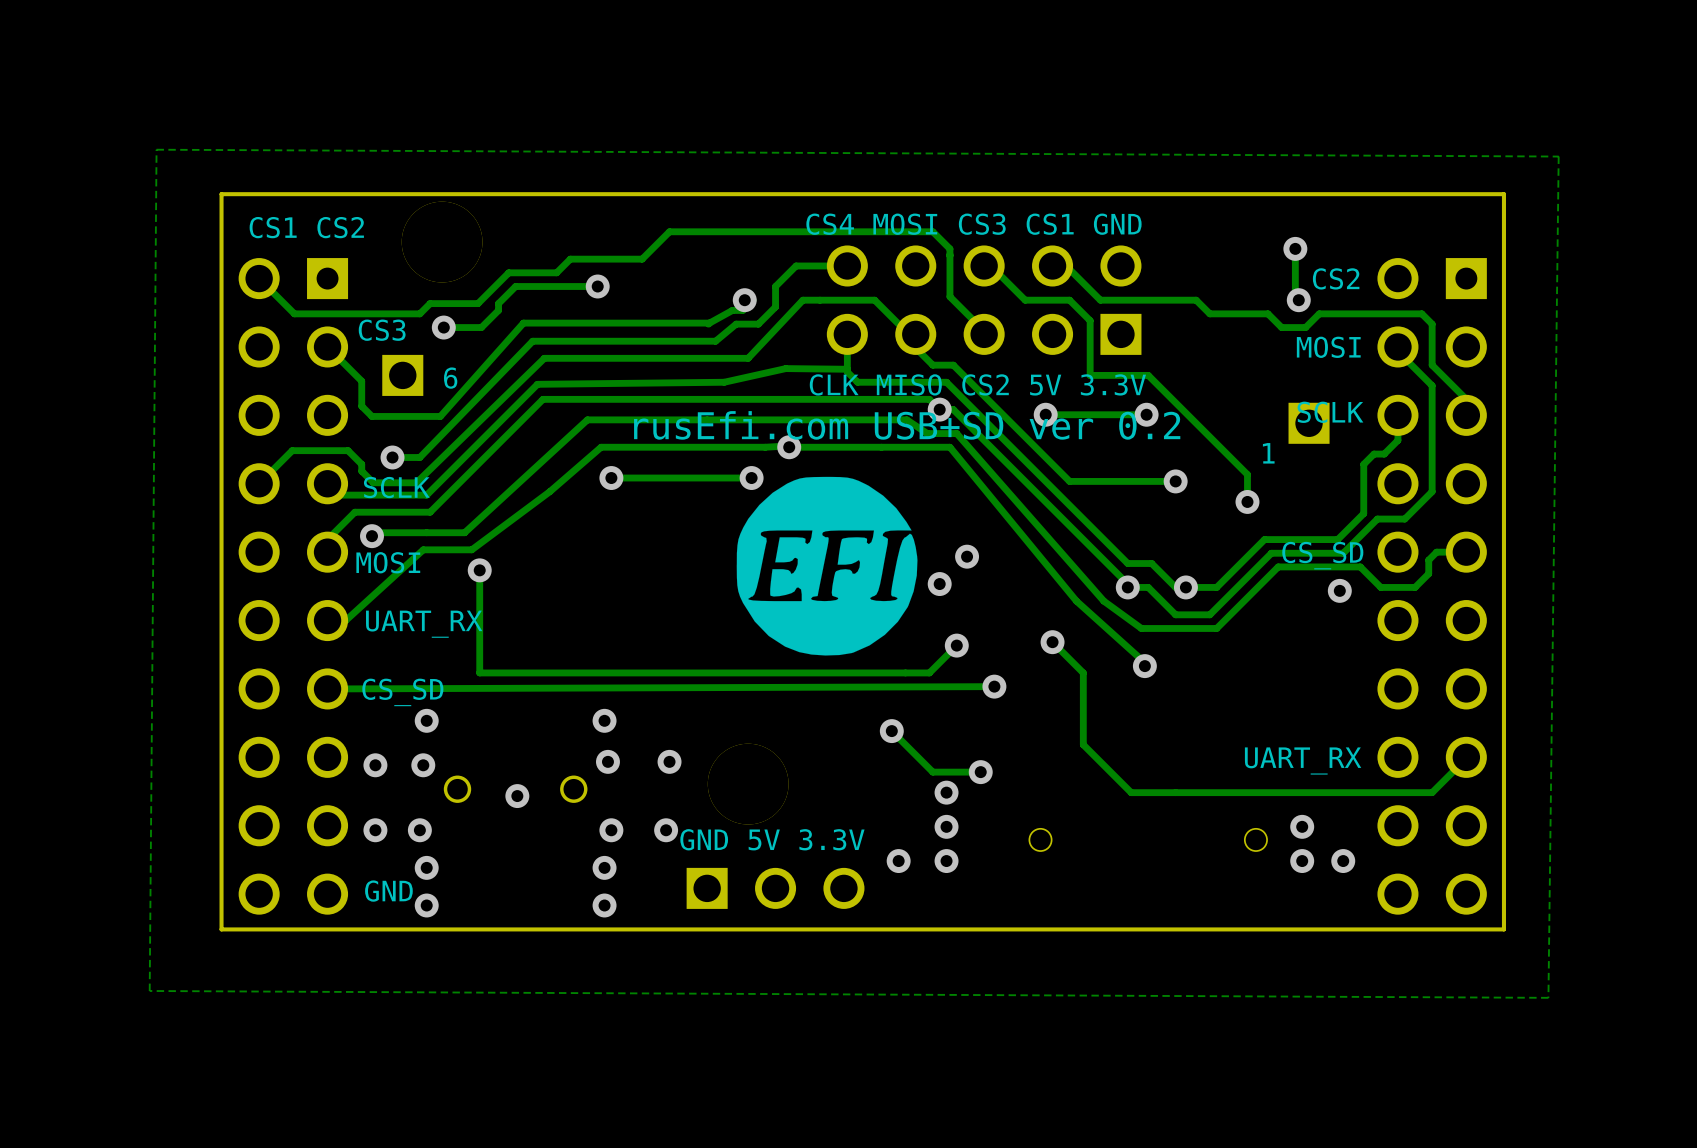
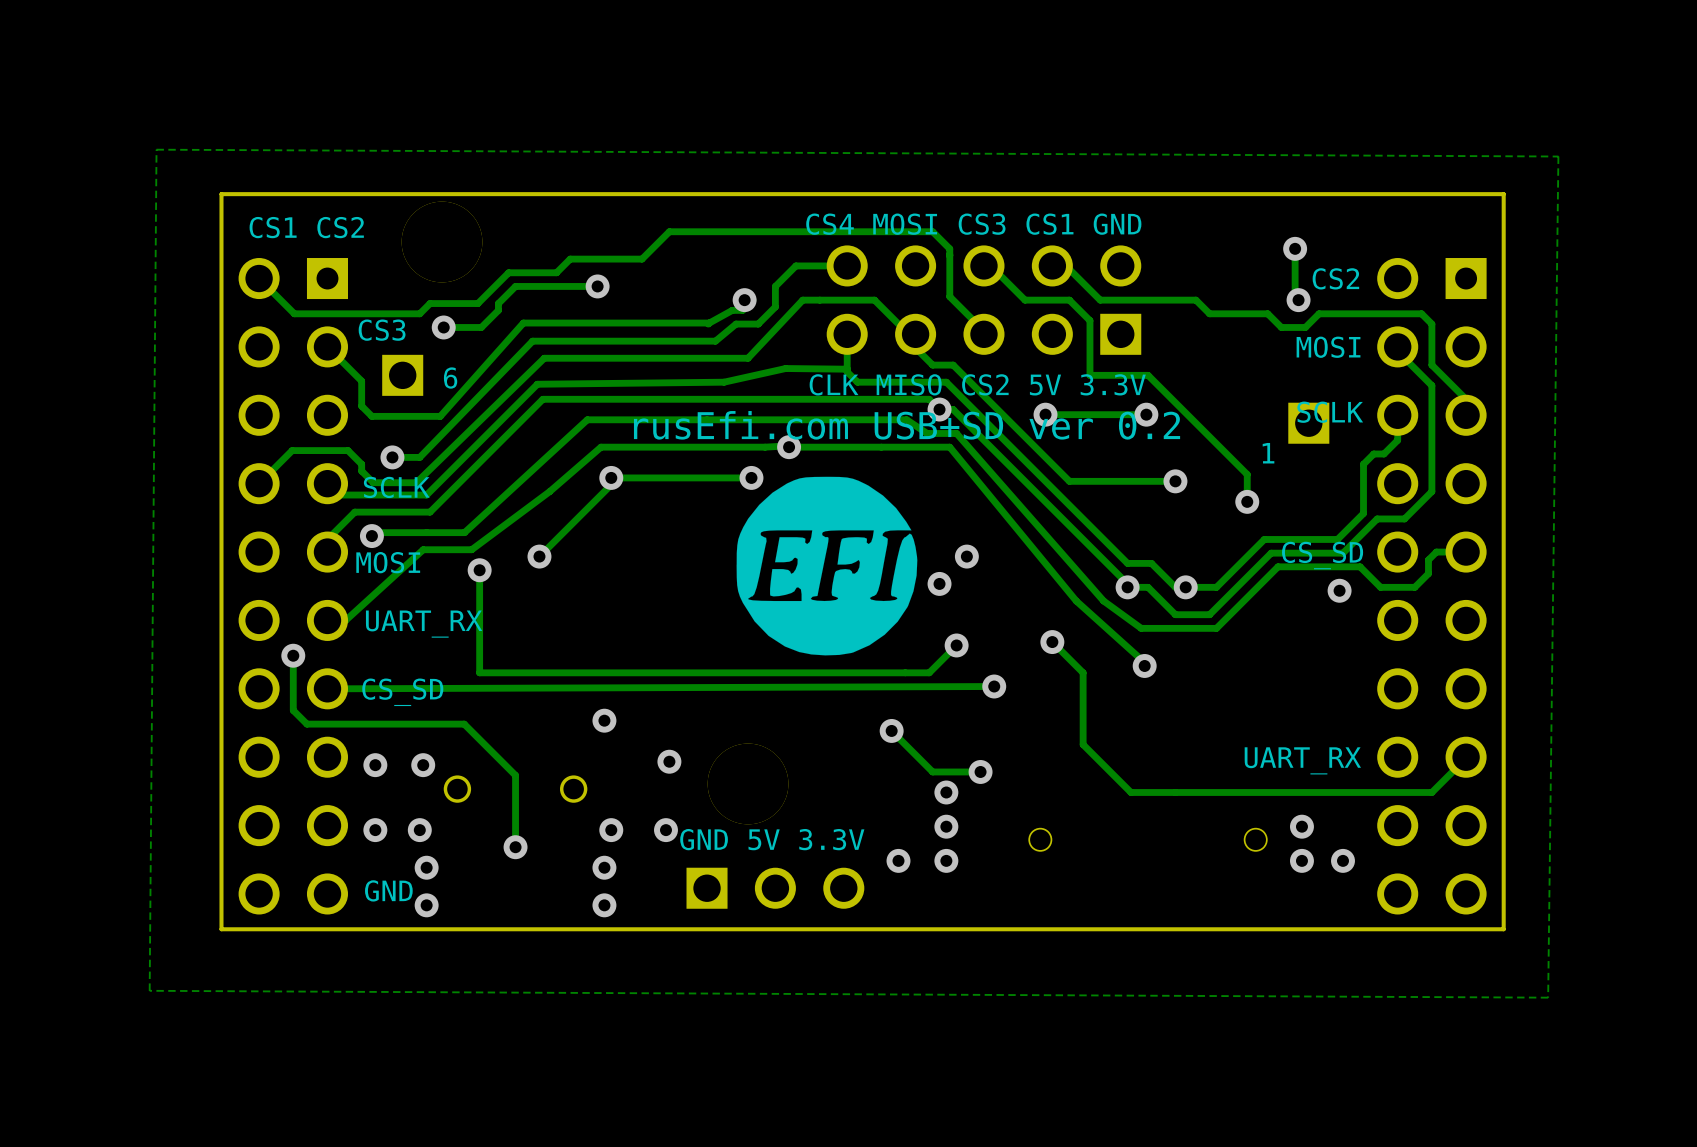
track: none -> (611, 477) (611, 484) (539, 556)
via: none -> (539, 556)
track: none -> (293, 655) (293, 710) (306, 724) (464, 724) (515, 775) (515, 847)
via: none -> (293, 655)
via: (426, 720) -> none
via: (607, 761) -> none
via position: (517, 796) -> (515, 847)

